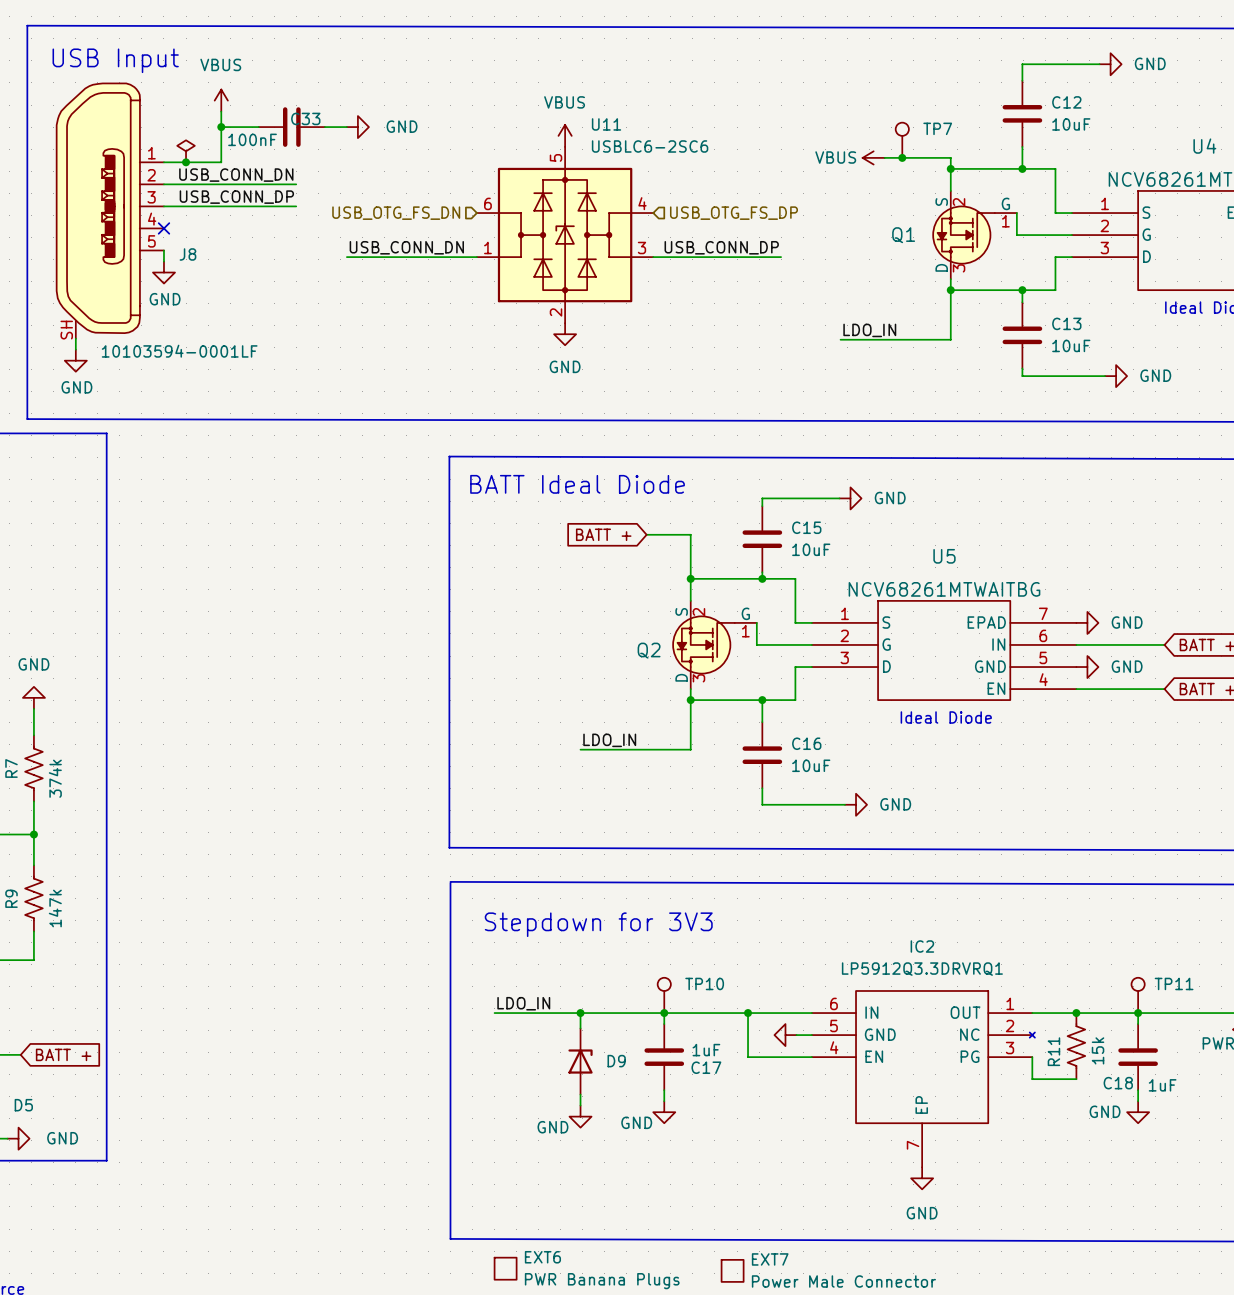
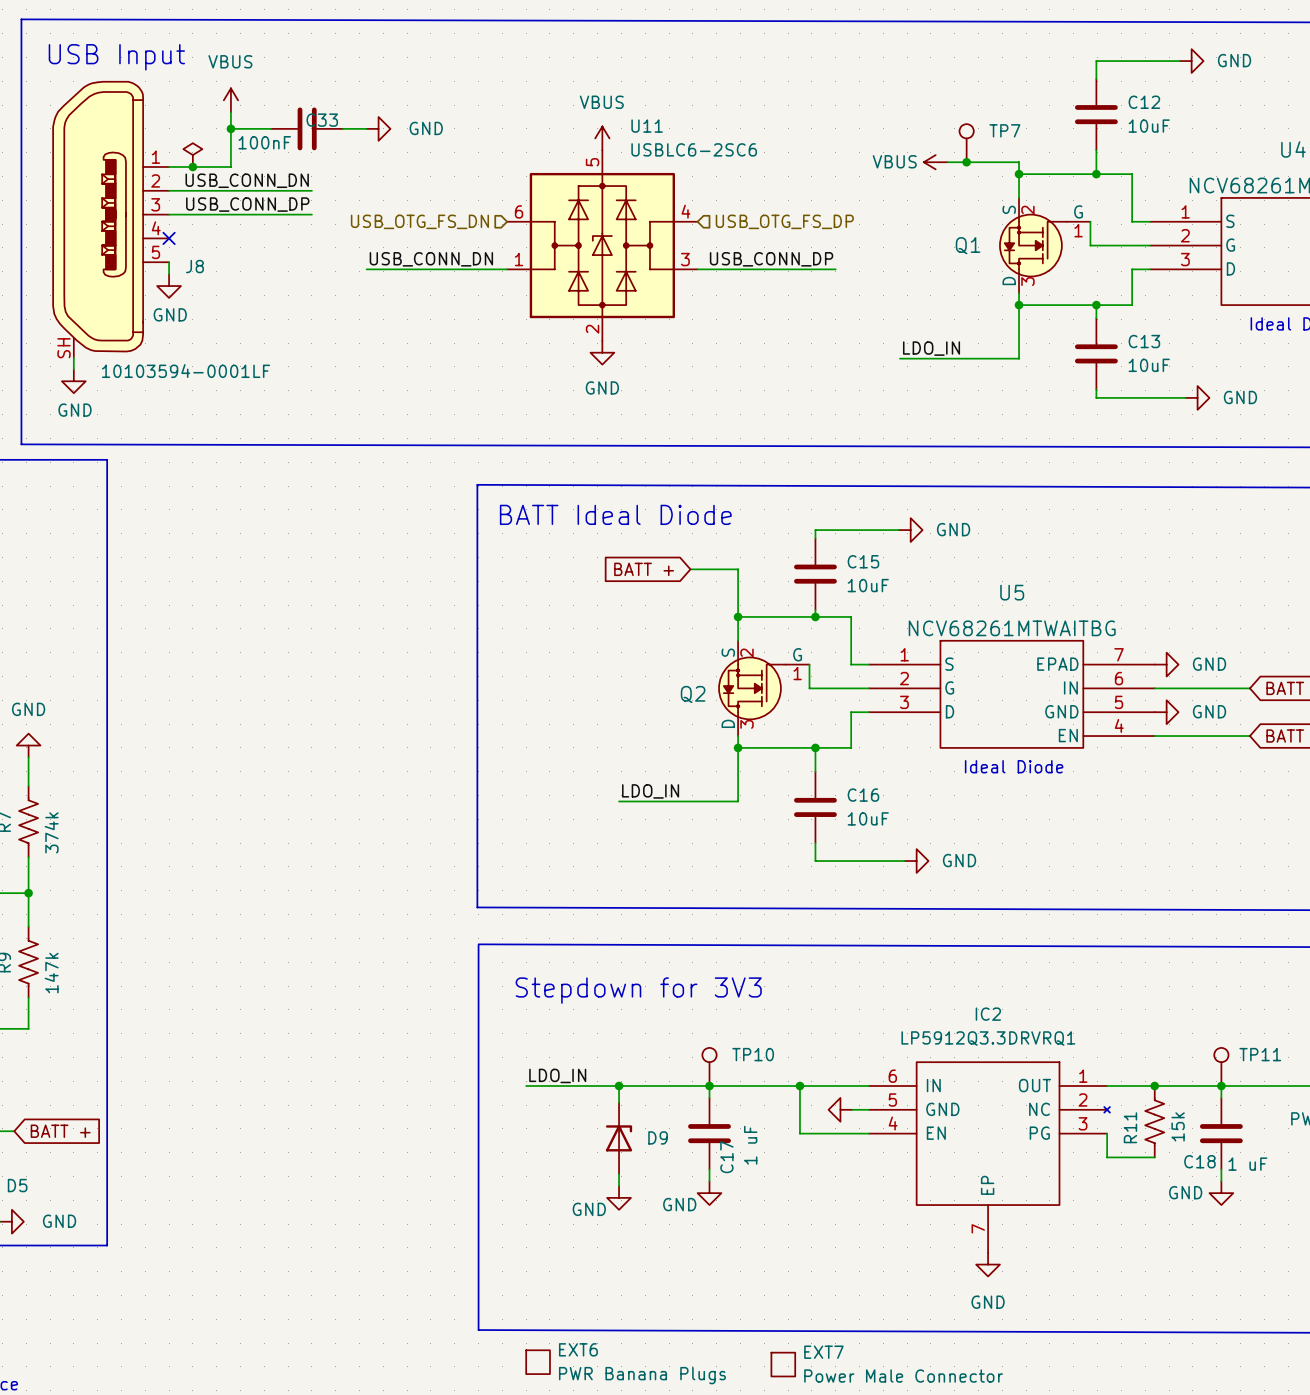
C17 value: 1uF (706, 1050) -> 1 uF (750, 1145)
C17 name rotation: 0° (706, 1067) -> 90° counterclockwise (726, 1157)
C18 value: 1uF (1162, 1085) -> 1 uF (1247, 1164)

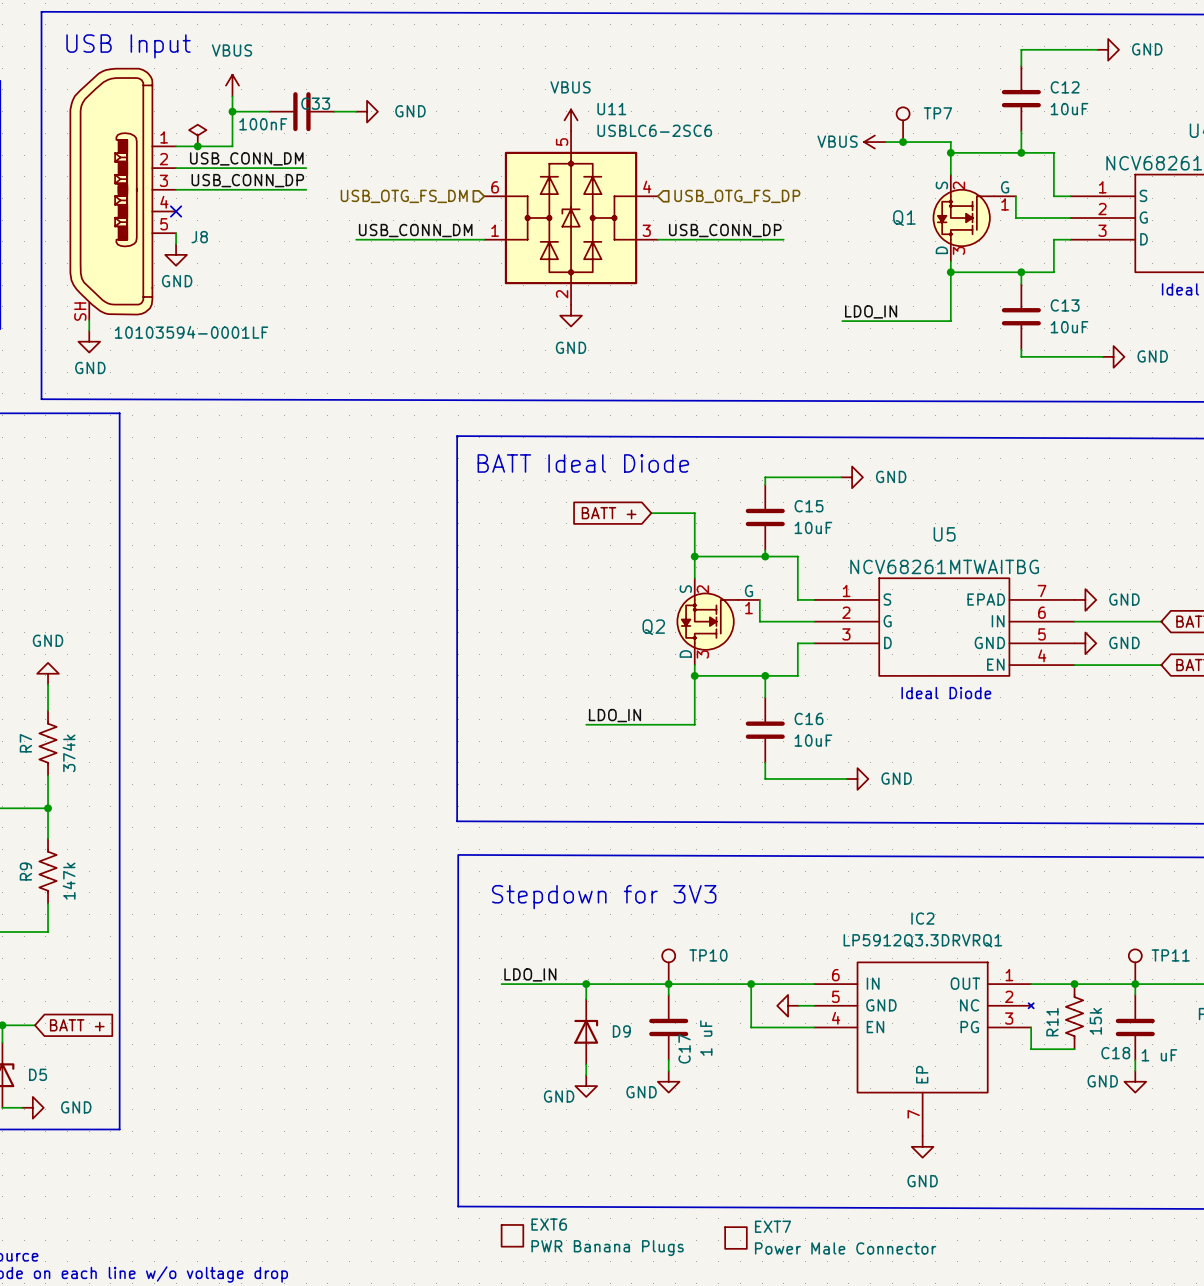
label: USB_CONN_DN (247, 180) -> USB_CONN_DM (246, 158)
hierarchical label: USB_OTG_FS_DN (419, 221) -> USB_OTG_FS_DM (404, 196)
label: USB_CONN_DN (431, 259) -> USB_CONN_DM (415, 230)

